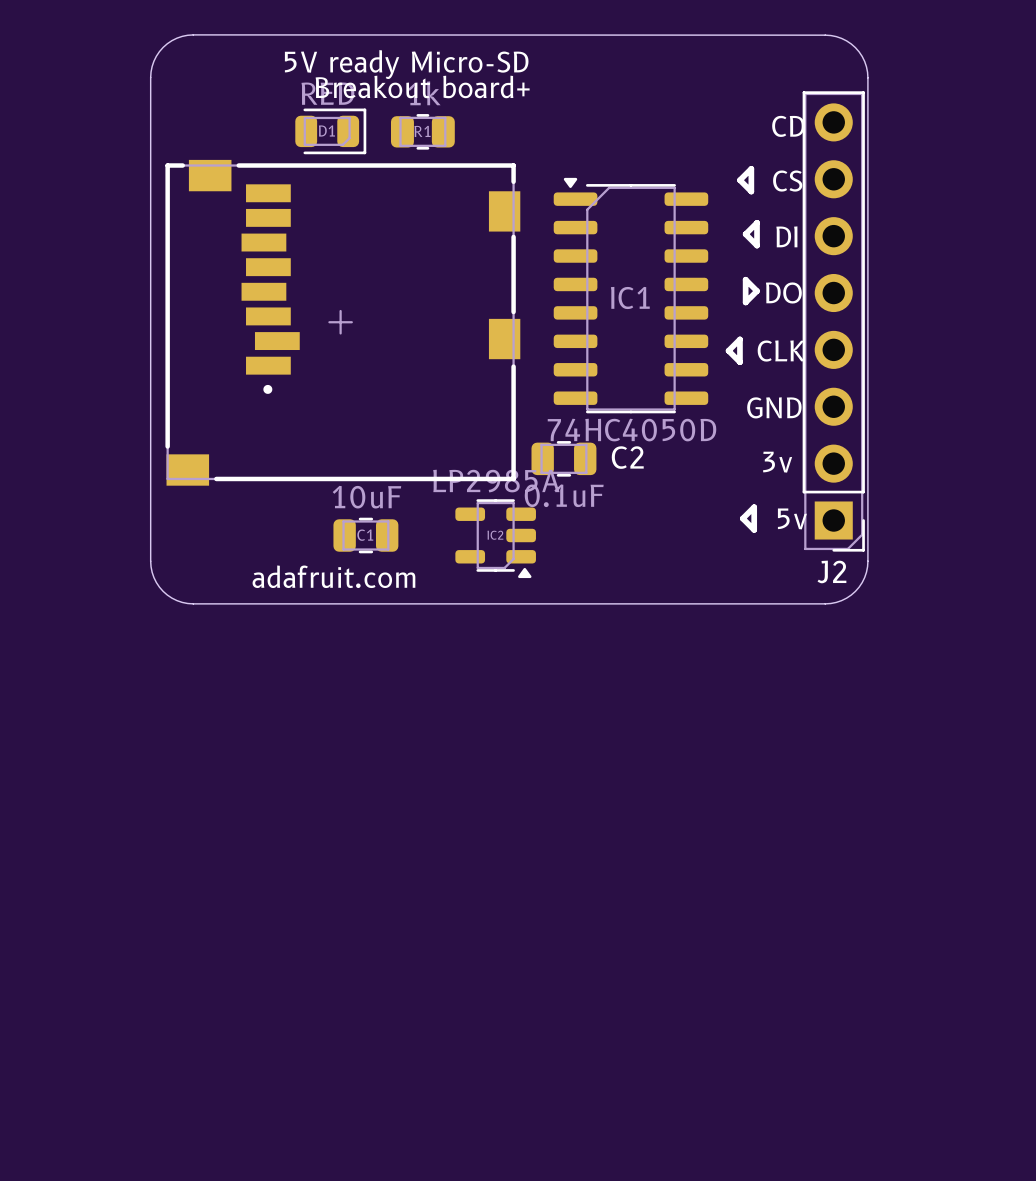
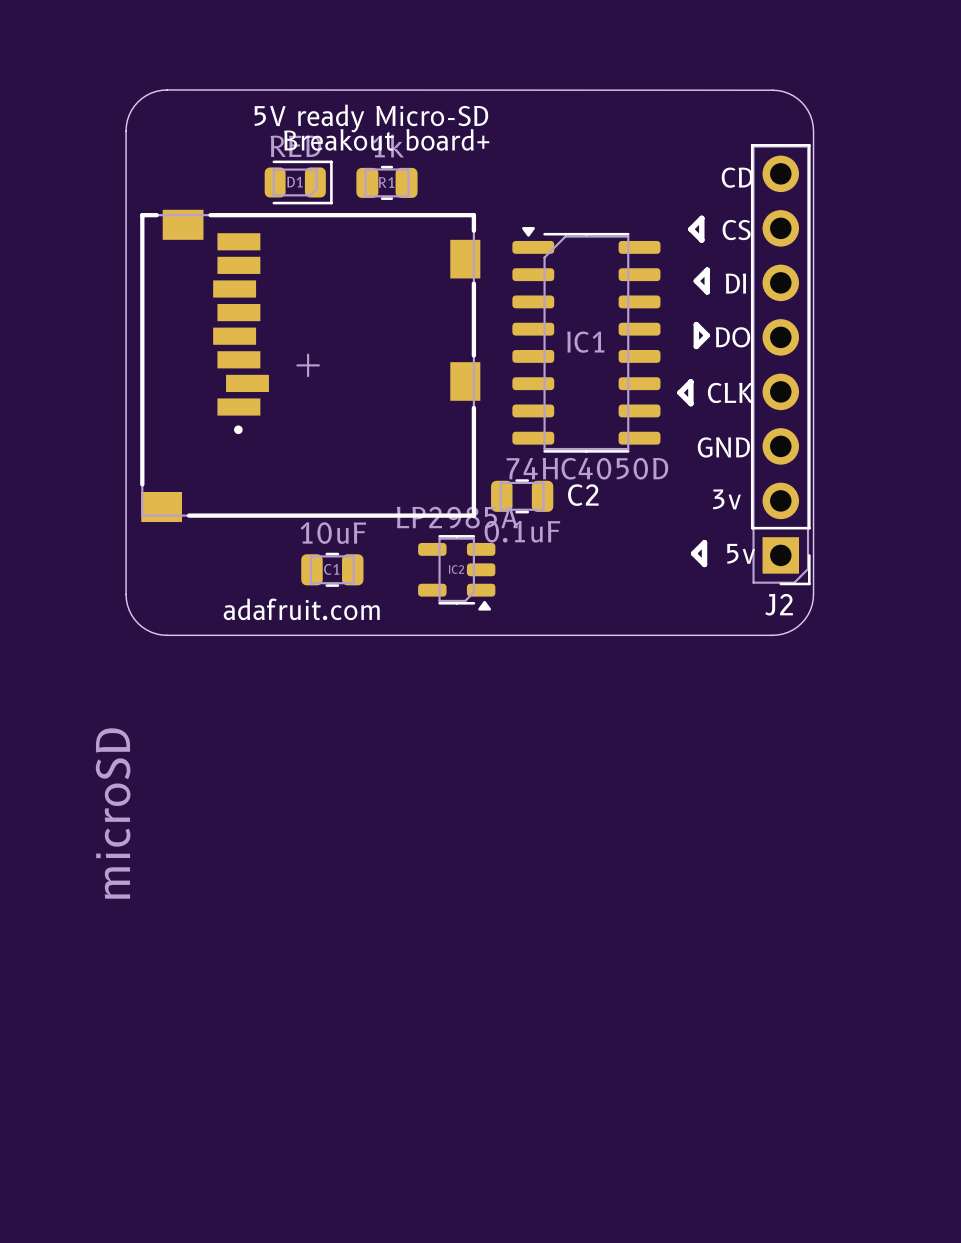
part value: none -> microSD (113, 813)

